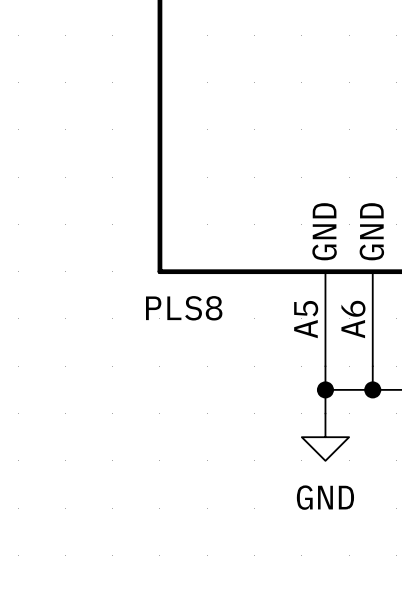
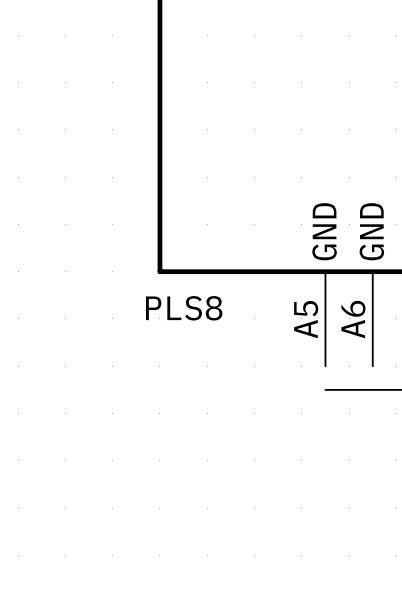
wire: (325, 366) (325, 413) -> none
wire: (372, 366) (372, 389) -> none
junction: (325, 389) -> none
junction: (372, 389) -> none
power symbol: GND (325, 437) -> none

